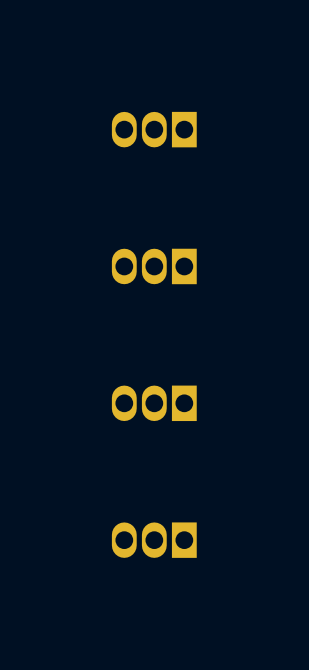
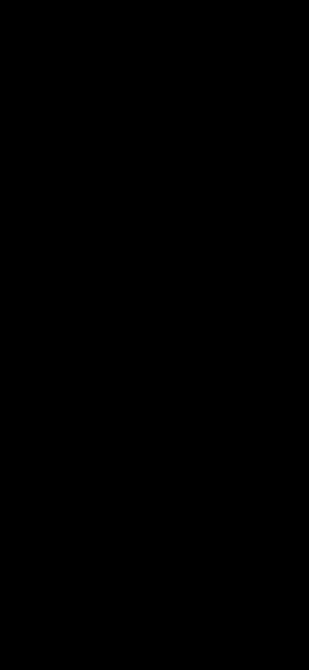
part: (154, 129) -> none
part: (154, 266) -> none
part: (154, 403) -> none
part: (154, 540) -> none

